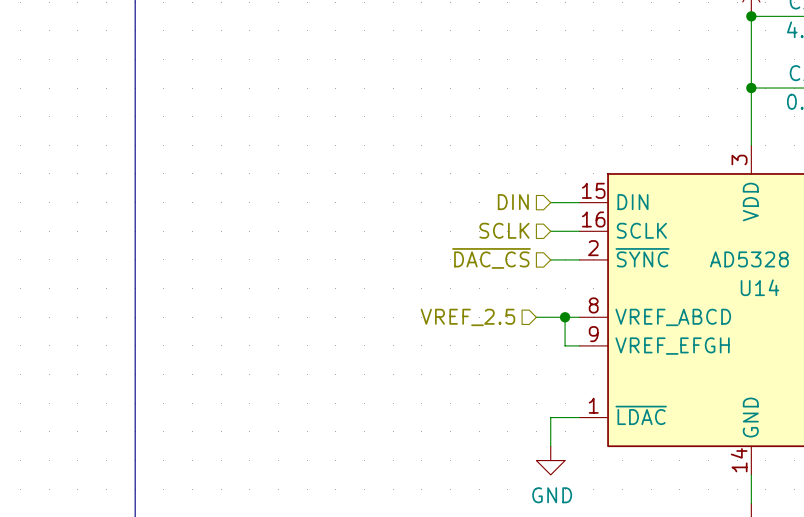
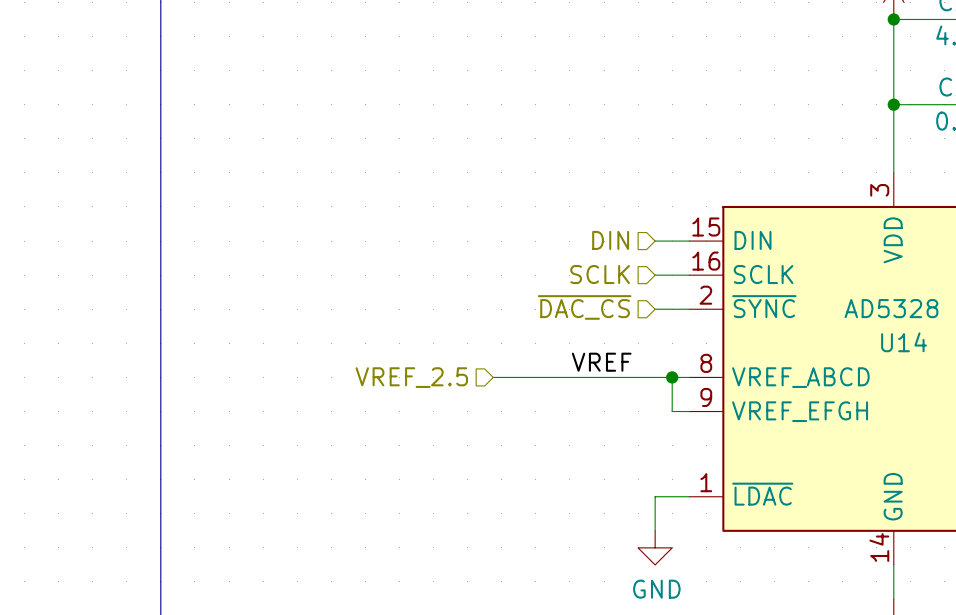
label: none -> VREF (601, 362)
wire: none -> (493, 377) (638, 377)
hierarchical label position: VREF_2.5 (467, 317) -> VREF_2.5 (411, 377)

